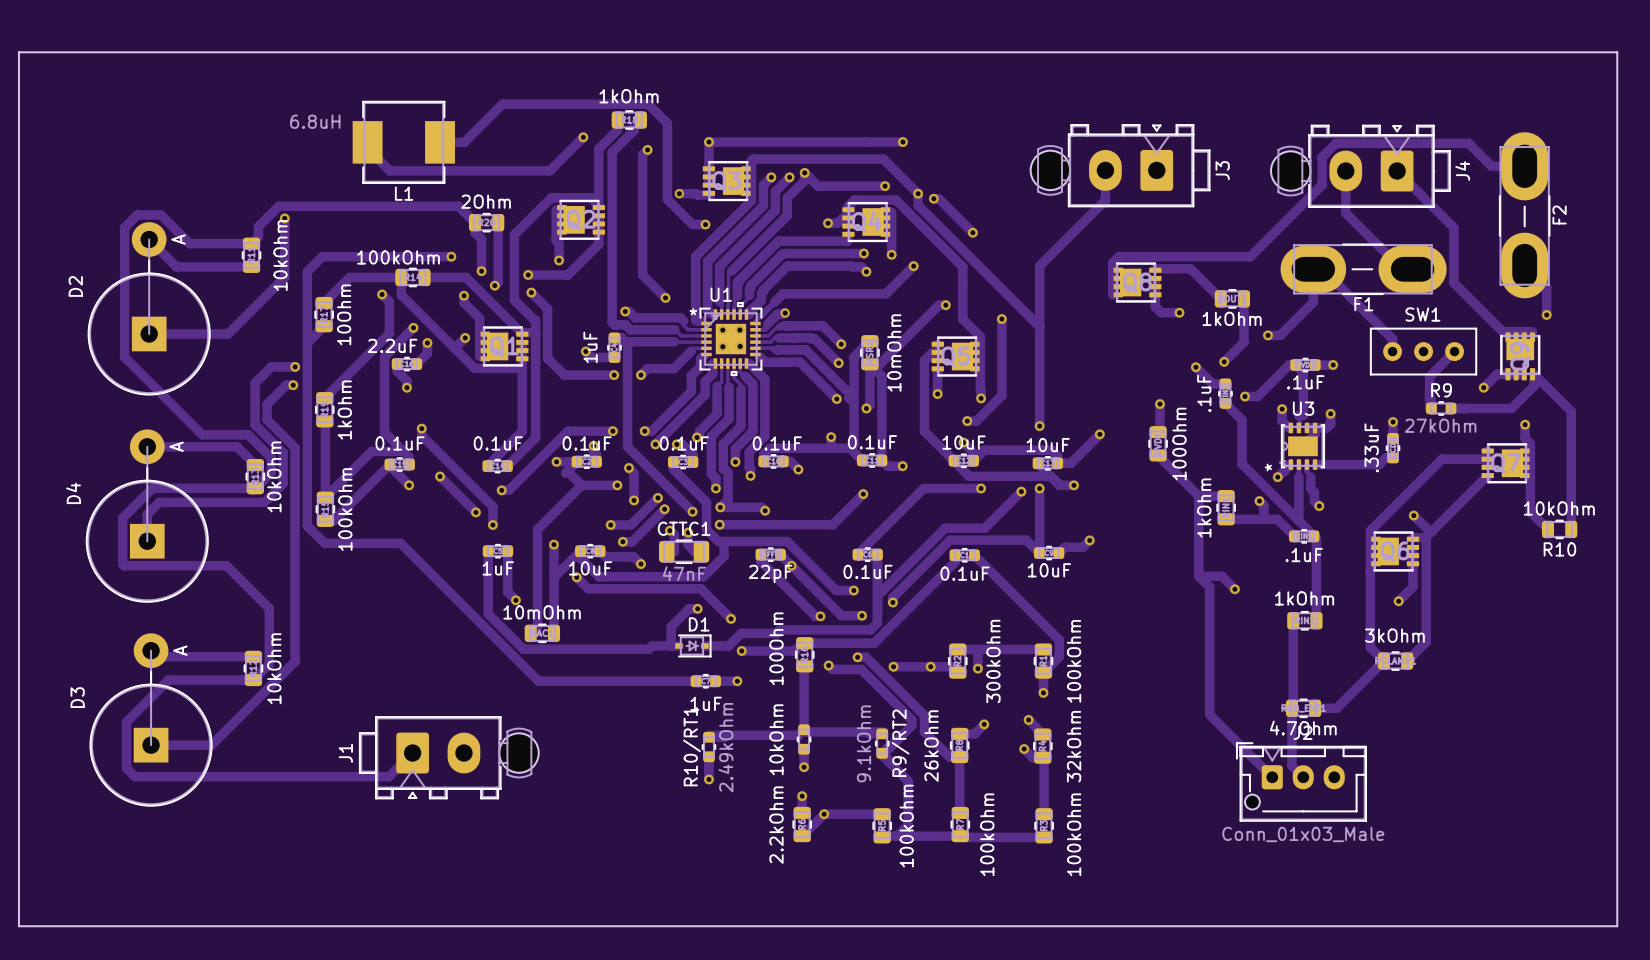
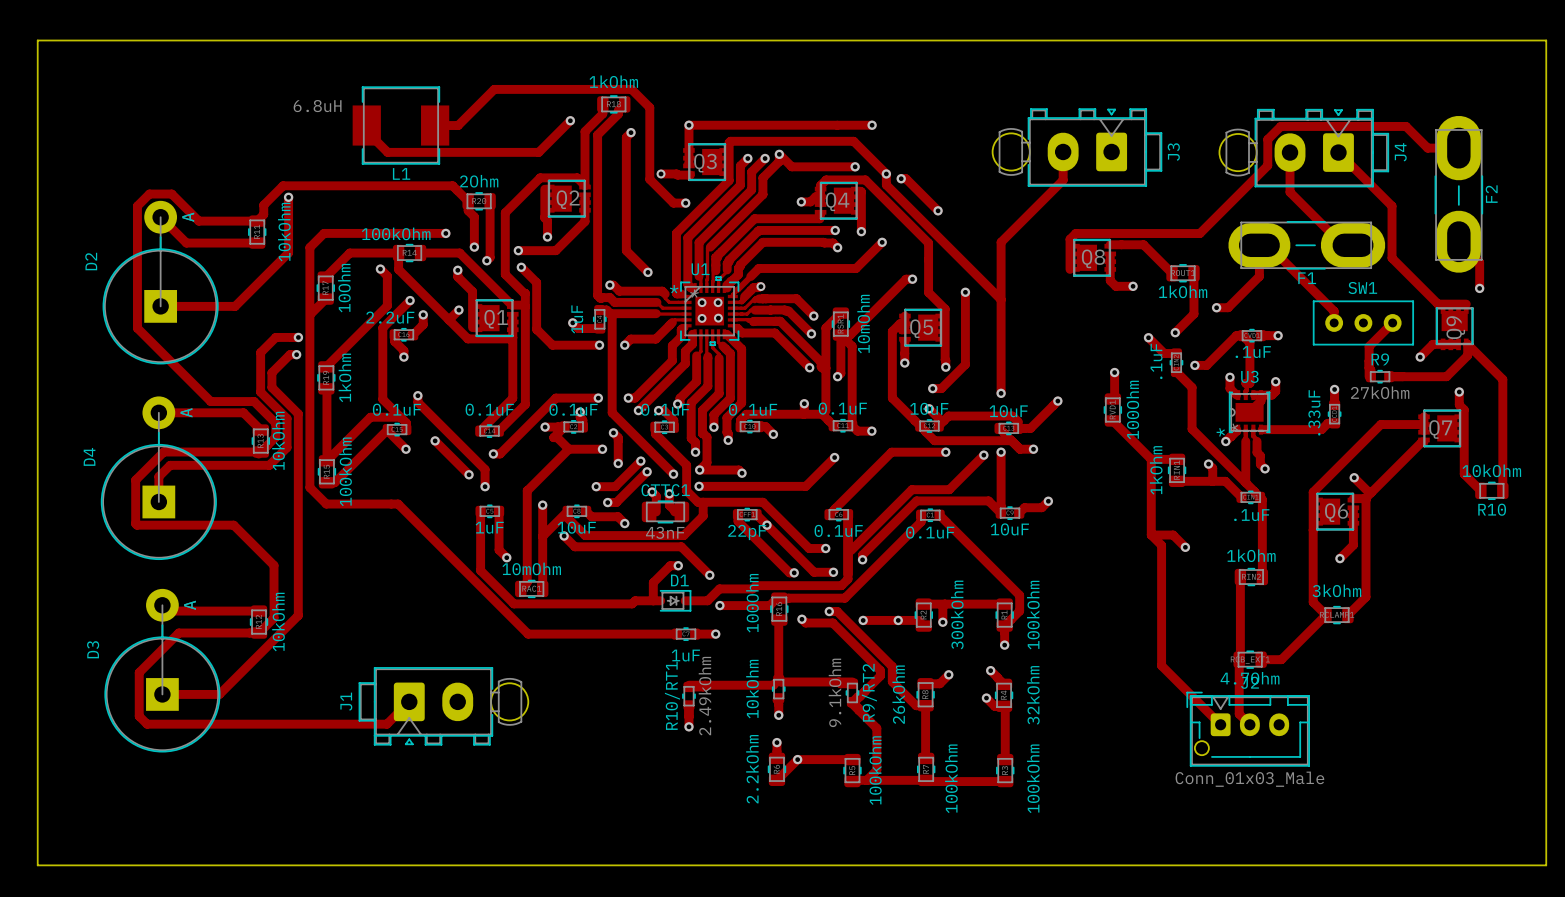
CTTC1 value: 47nF (684, 573) -> 43nF (665, 532)

